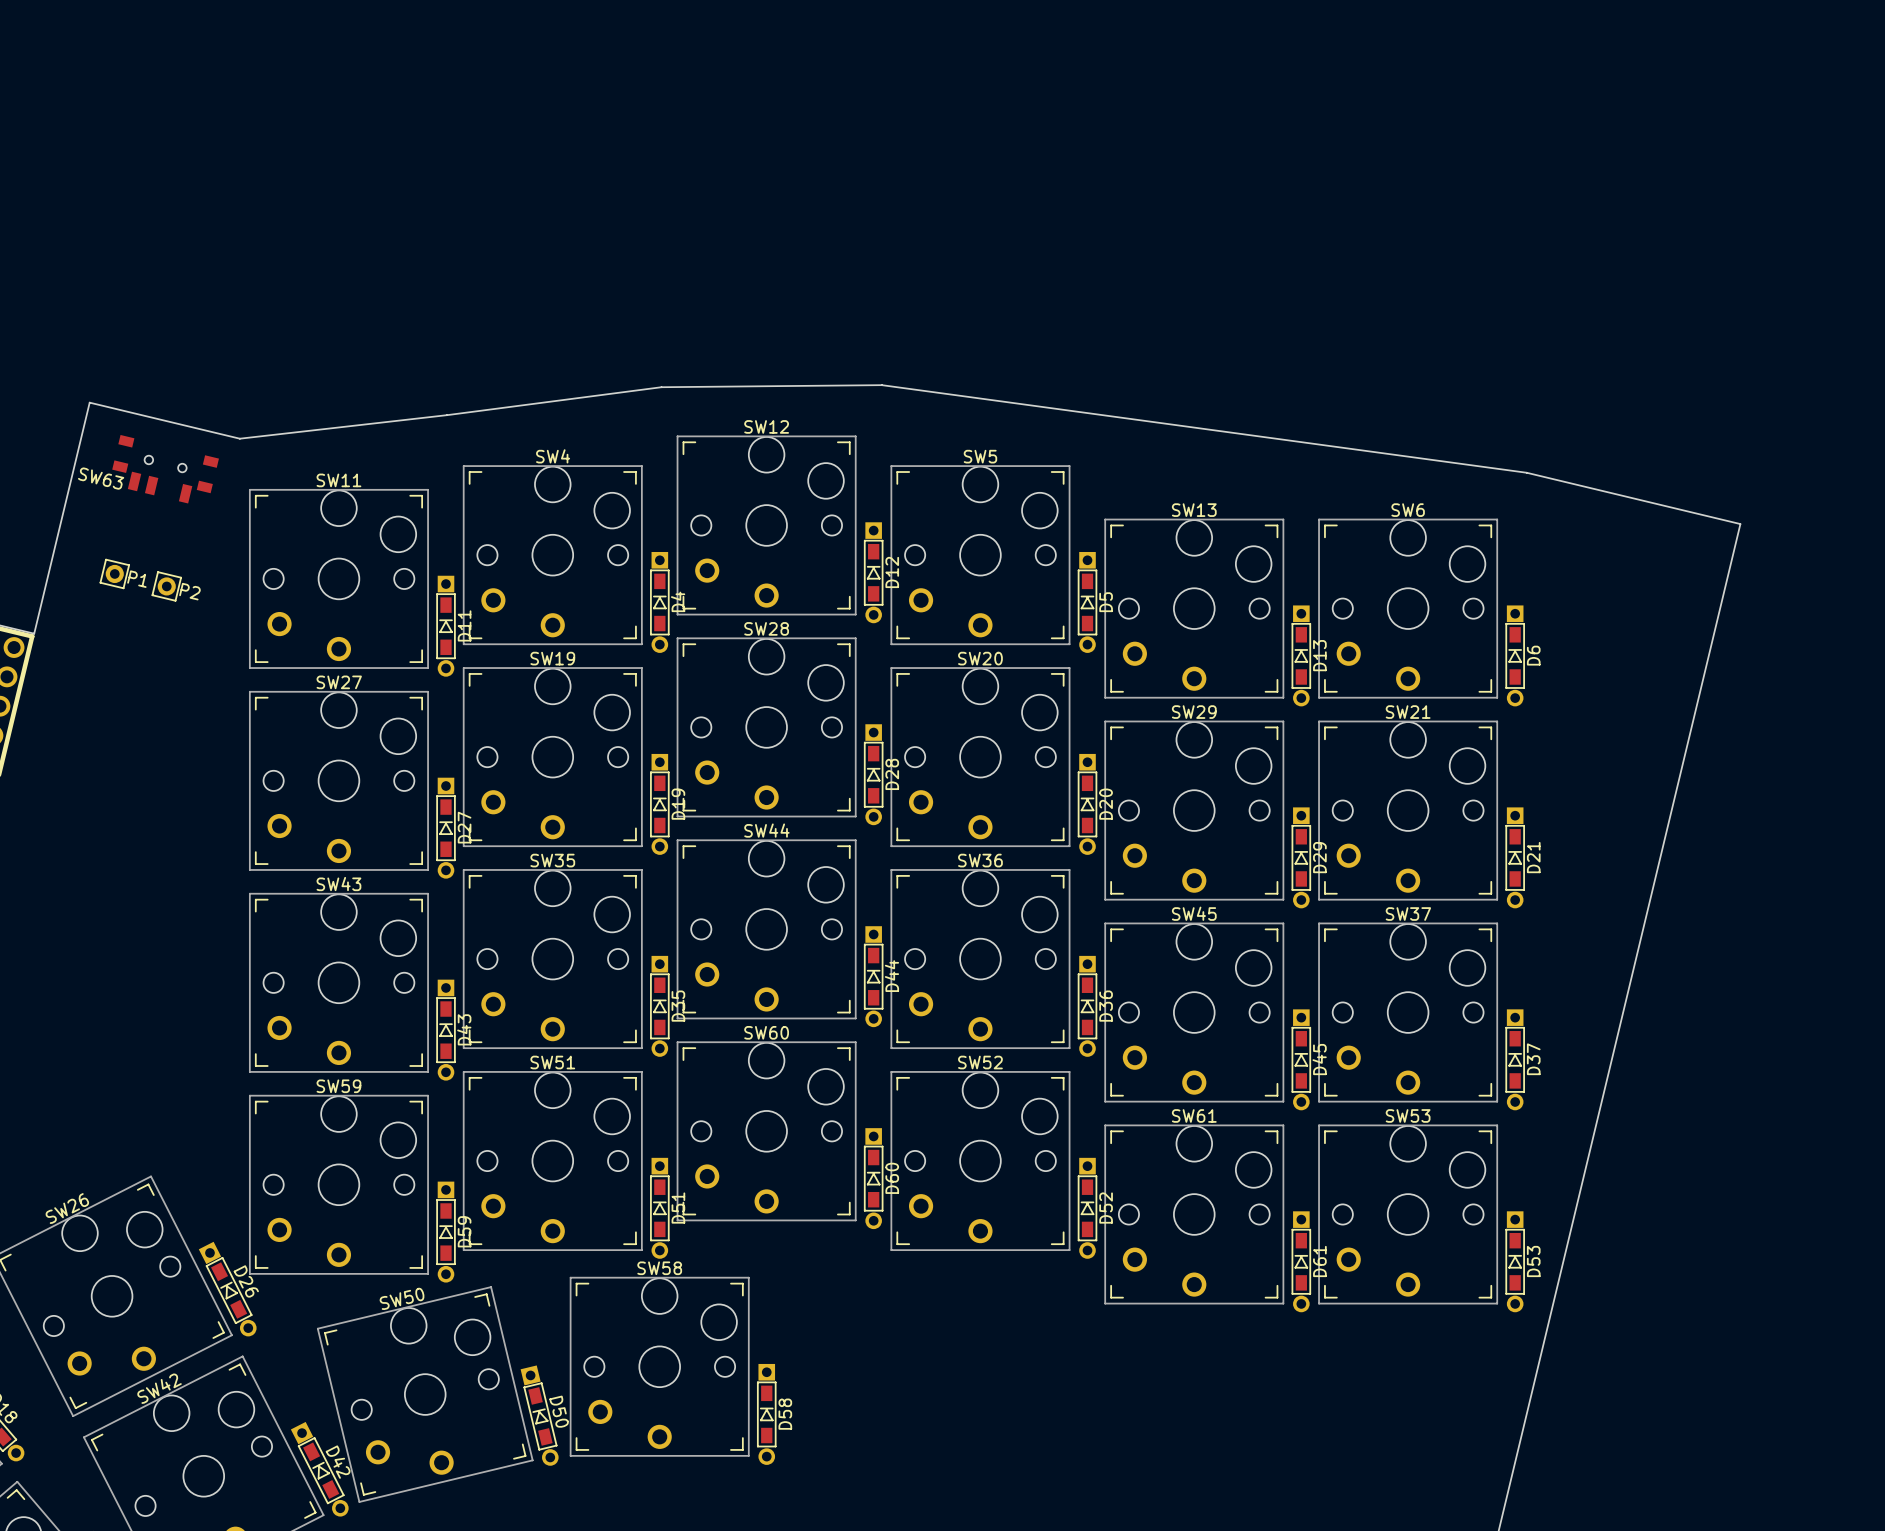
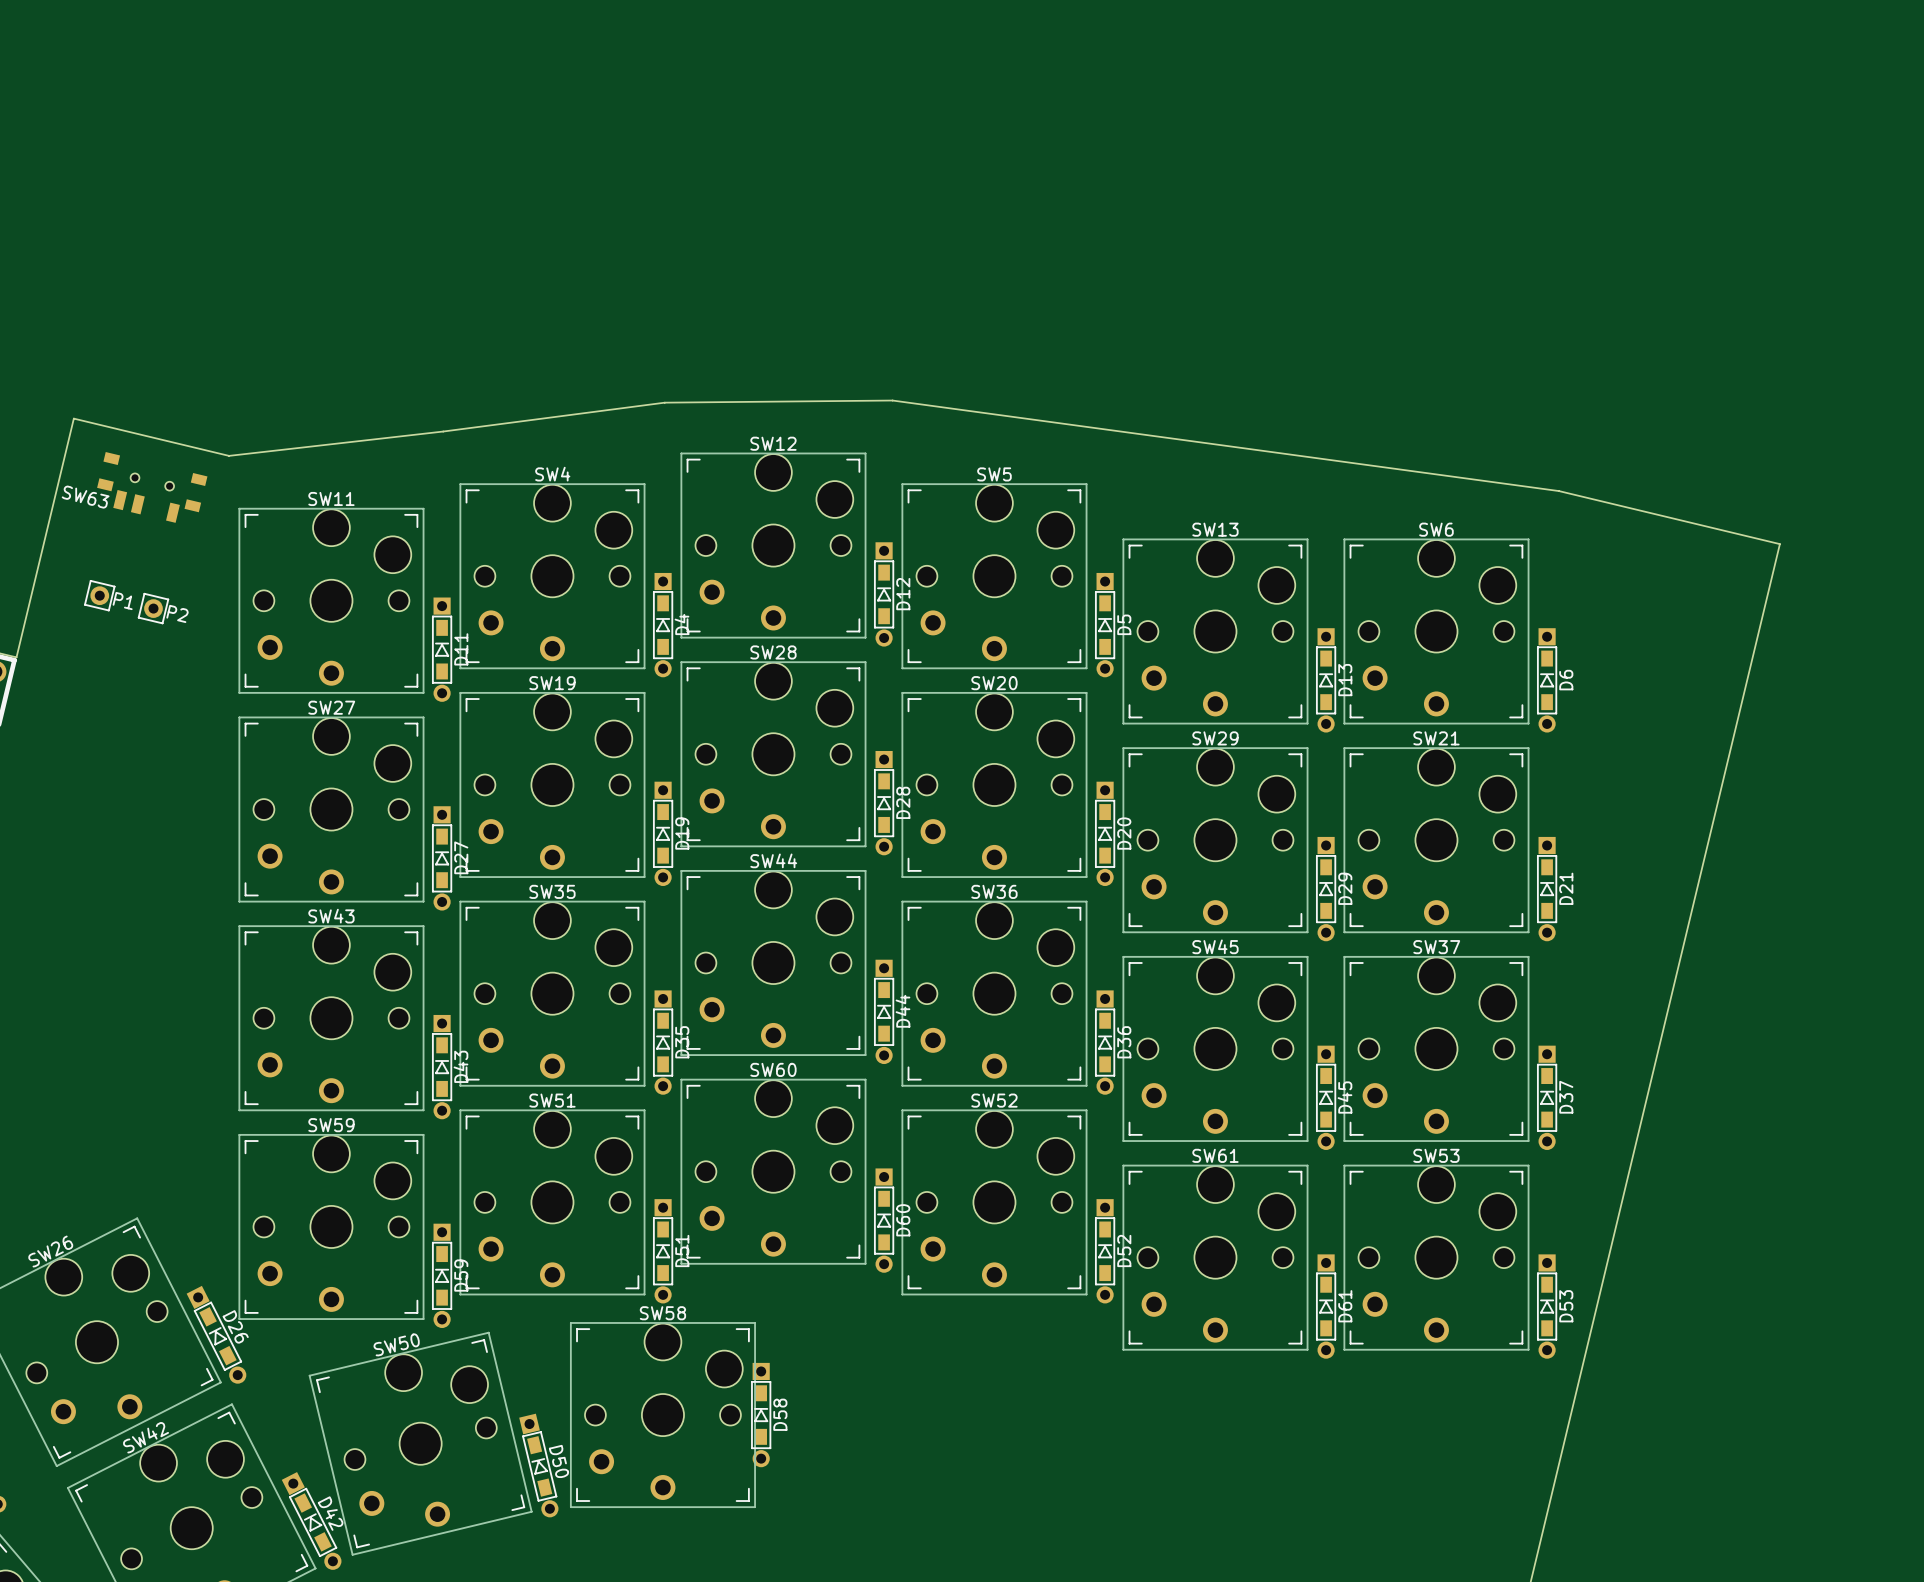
D58 position: (766, 1414) -> (761, 1415)

